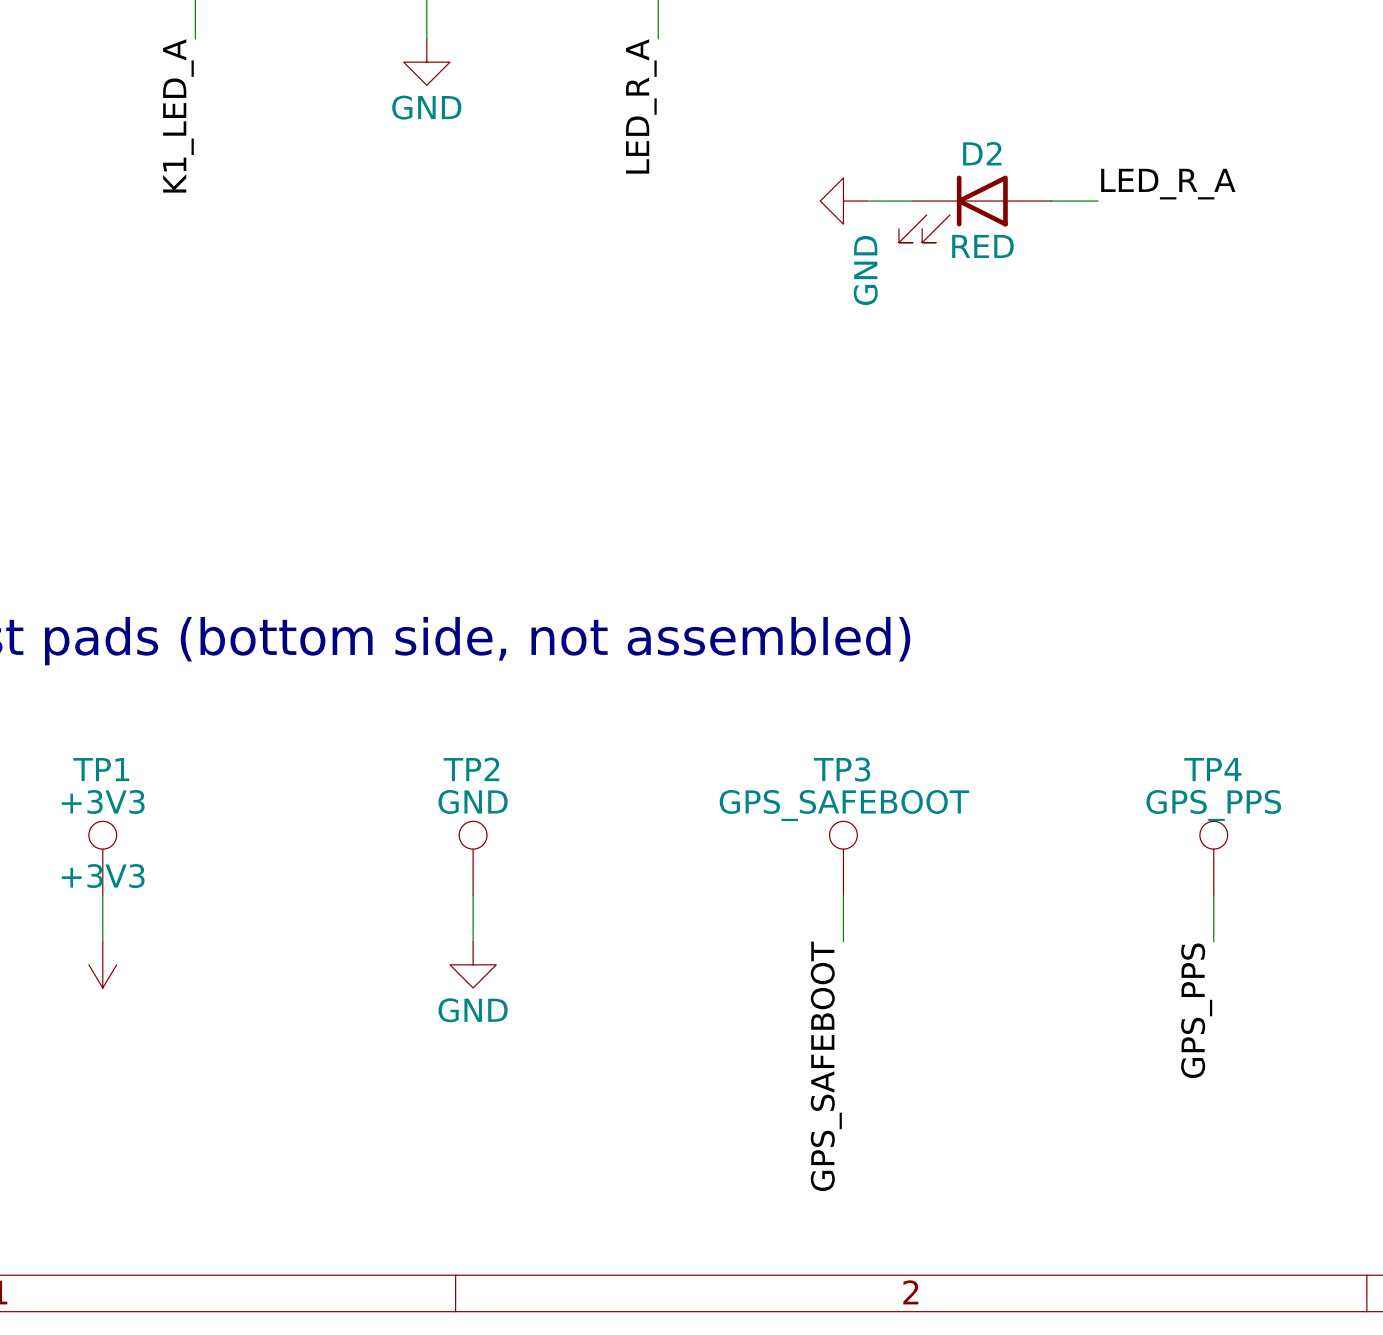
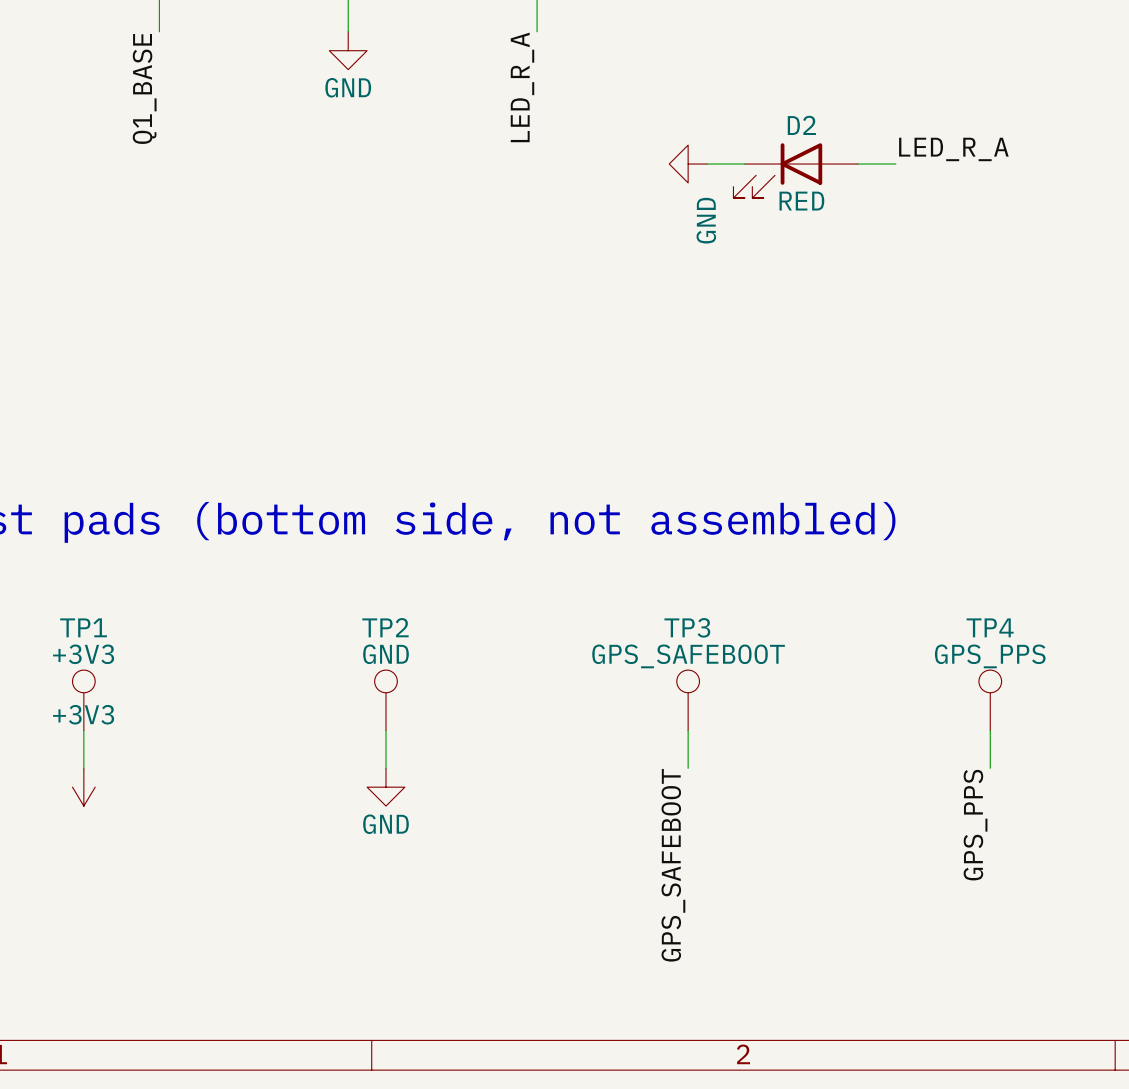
label: K1_LED_A (178, 115) -> Q1_BASE (144, 88)

